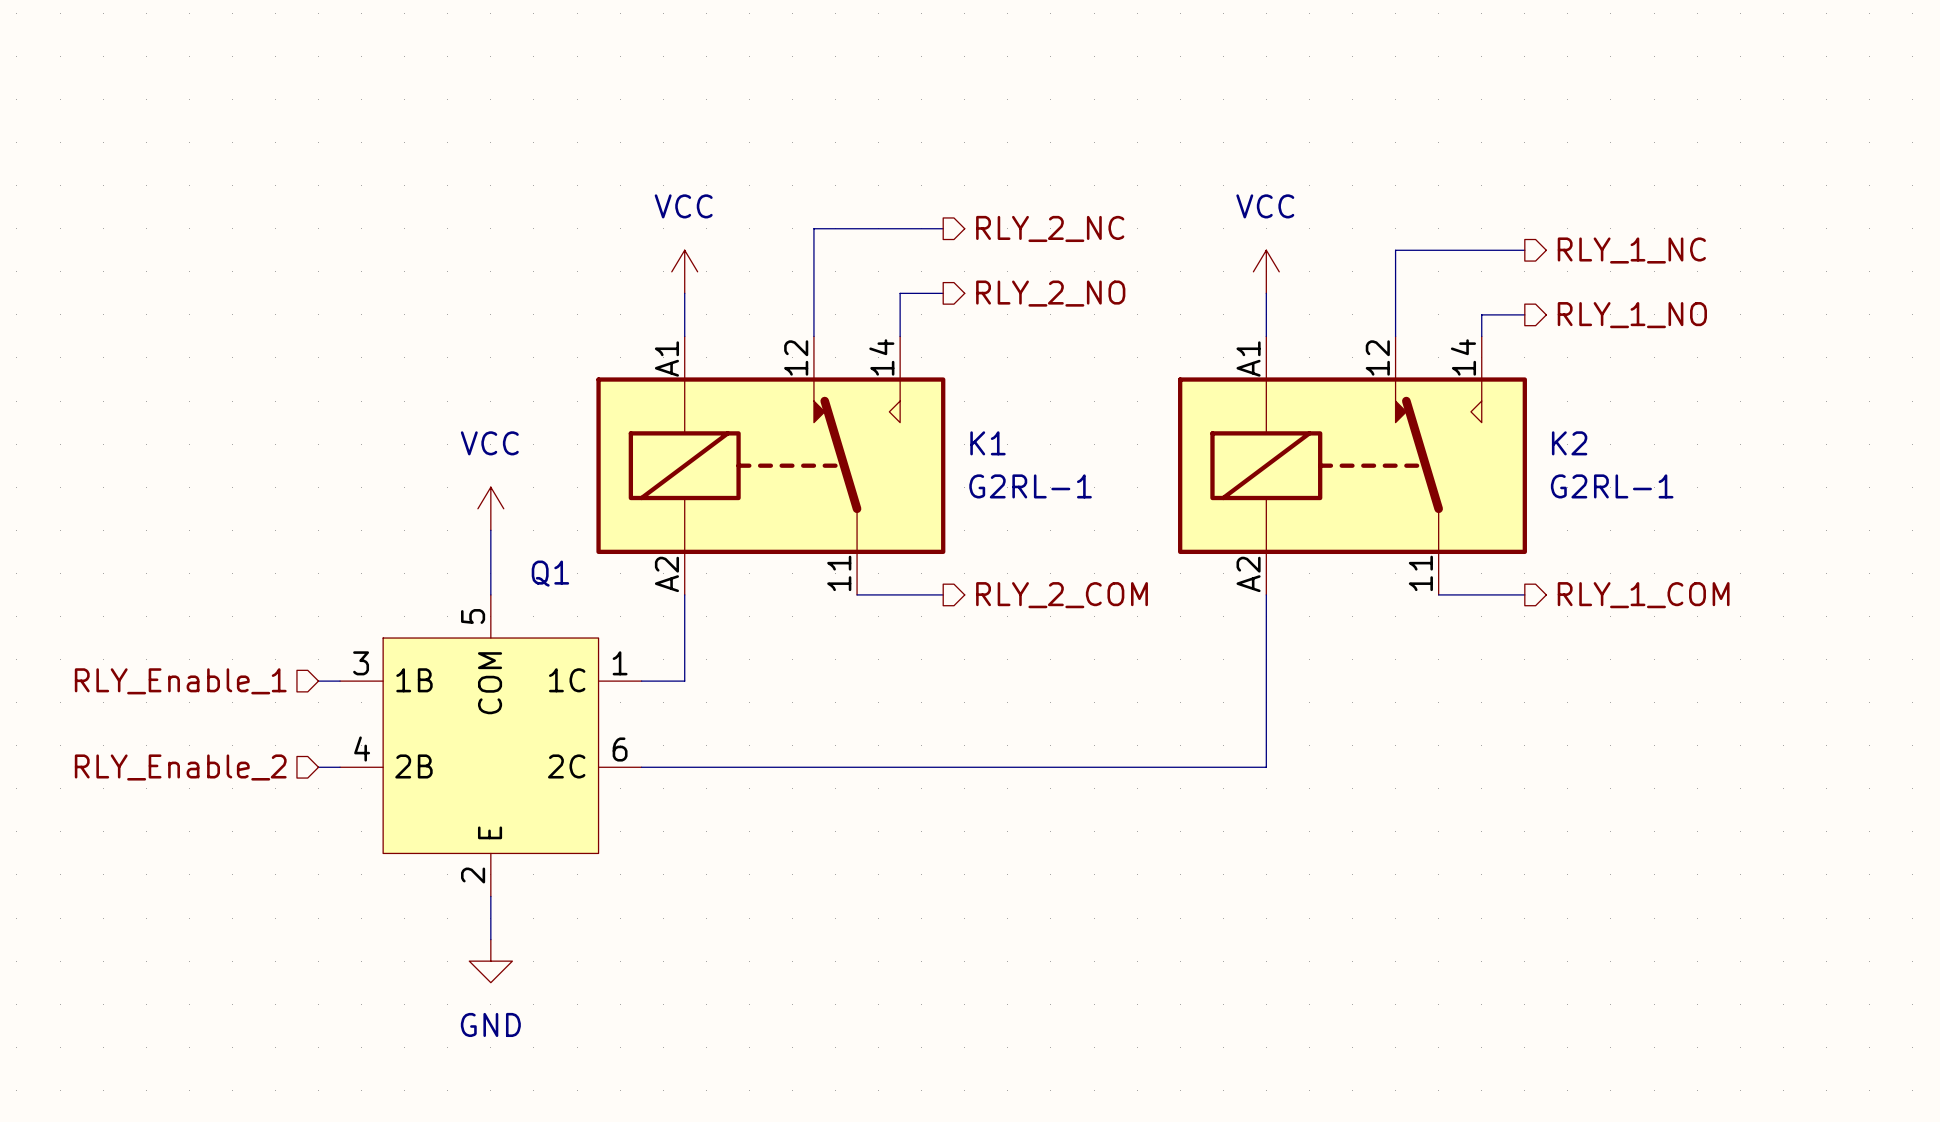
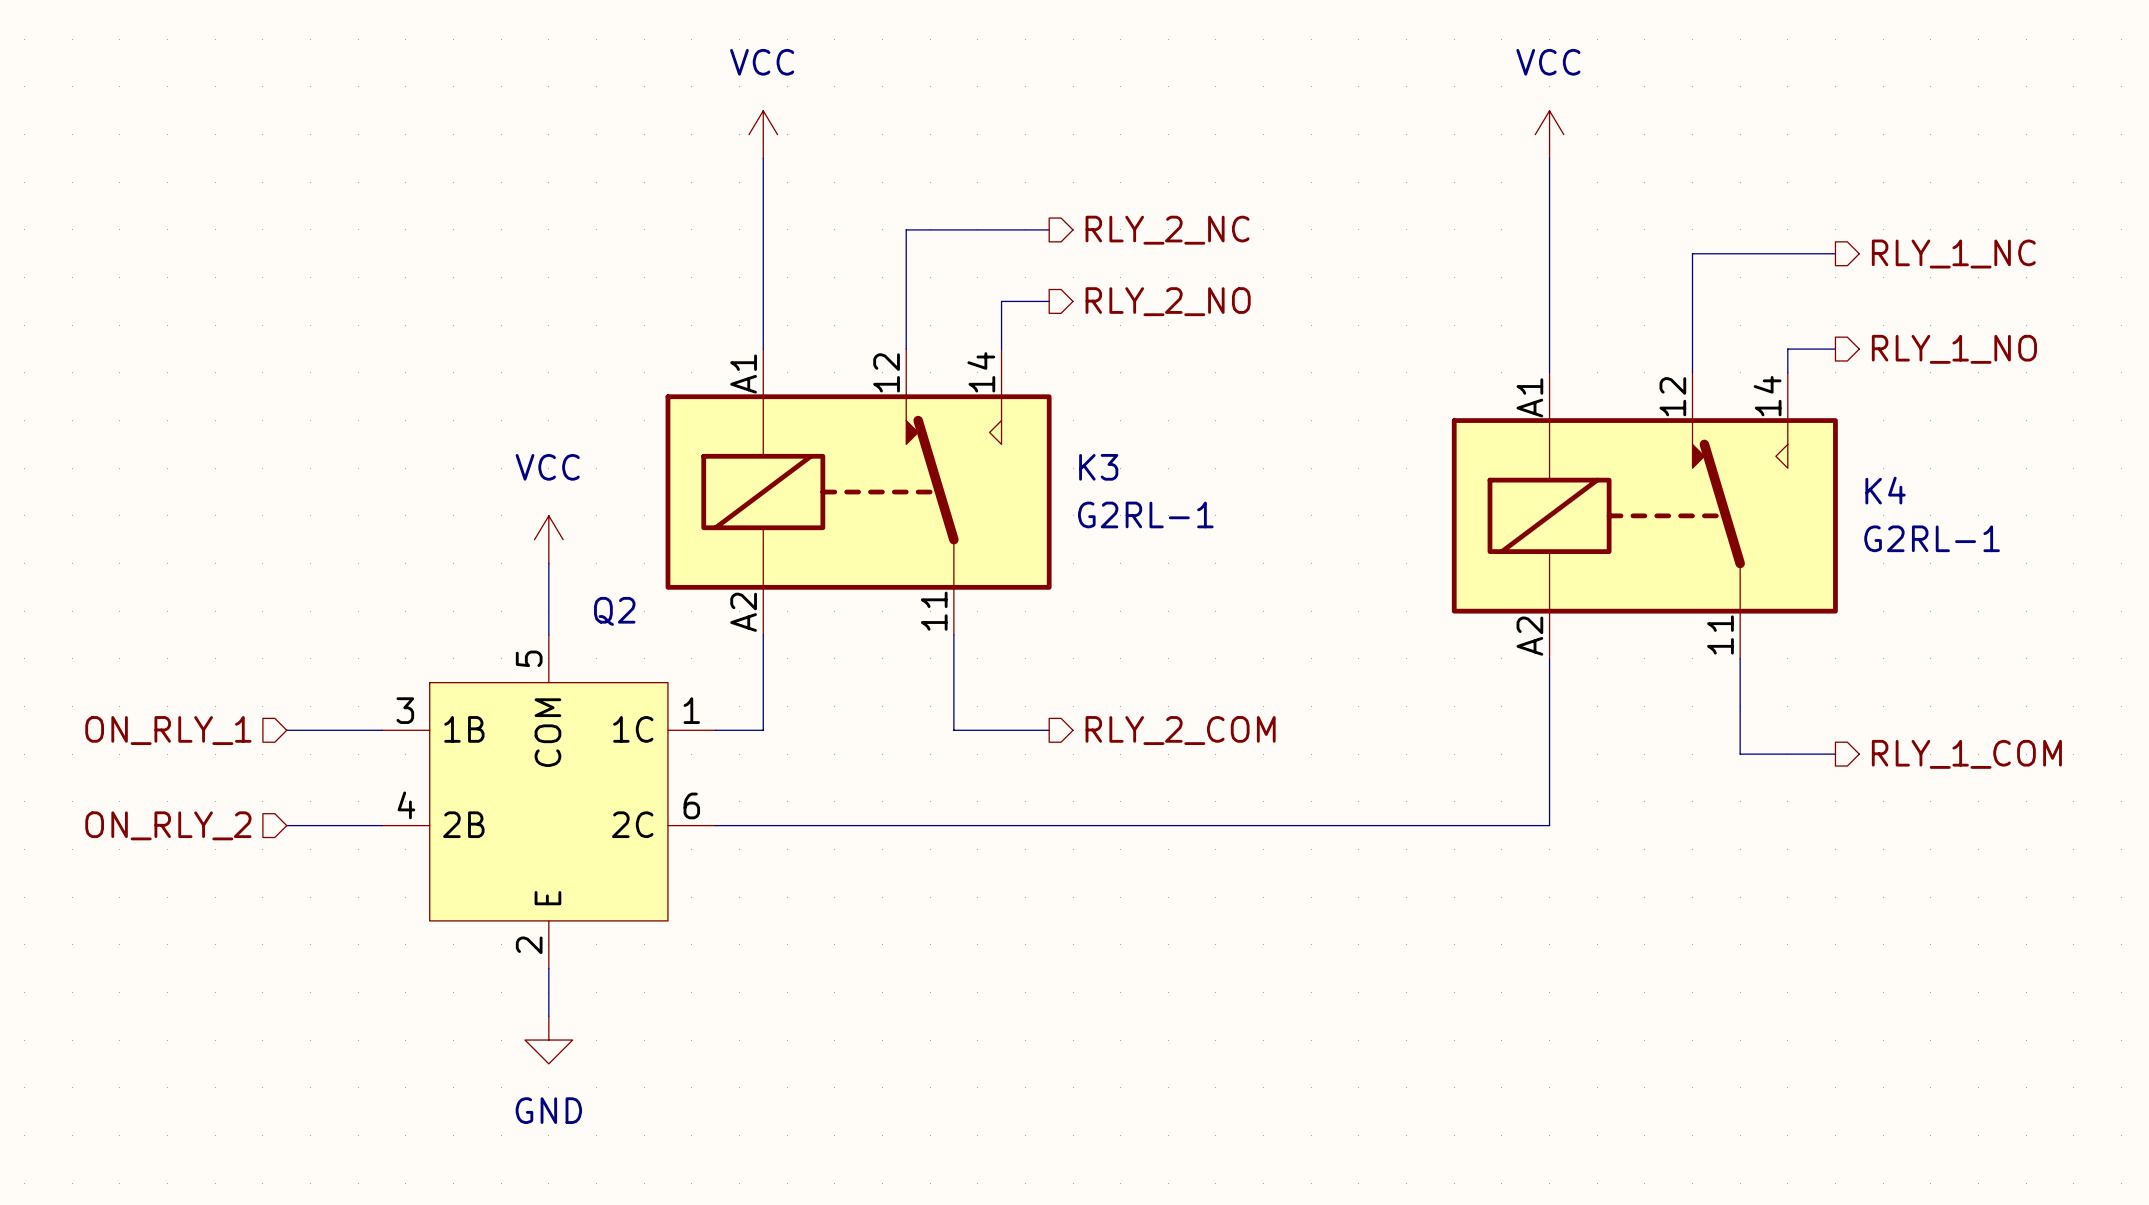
wire: none -> (763, 158) (763, 301)
wire: (1395, 250) (1524, 250) -> (1549, 253) (1549, 158)
hierarchical label position: RLY_1_NC (1631, 250) -> RLY_1_NC (1953, 254)
wire: none -> (1835, 253) (1692, 253) (1692, 372)
power symbol position: VCC (684, 271) -> VCC (763, 134)
power symbol position: VCC (1266, 271) -> VCC (1549, 134)
wire: (1266, 293) (1266, 336) -> none
wire: (1524, 314) (1481, 314) (1481, 336) -> (1835, 349) (1787, 349) (1787, 372)
hierarchical label position: RLY_1_NO (1632, 315) -> RLY_1_NO (1954, 349)
K1 name: K1 (987, 443) -> K3 (1098, 467)
K2: G2RL-1 (1352, 465) -> none
K4: none -> G2RL-1 (1644, 515)
Q1 name: Q1 (550, 573) -> Q2 (614, 611)
wire: (857, 594) (943, 594) -> (953, 634) (953, 730) (1049, 730)
wire: (1266, 594) (1266, 767) -> (1549, 658) (1549, 825) (1406, 825)
wire: (1438, 594) (1524, 594) -> none
hierarchical label position: RLY_2_COM (1062, 595) -> RLY_2_COM (1180, 730)
hierarchical label position: RLY_1_COM (1643, 595) -> RLY_1_COM (1966, 754)
wire: none -> (1740, 658) (1740, 754) (1835, 754)
hierarchical label: none -> ON_RLY_1 (168, 730)
hierarchical label: RLY_Enable_1 (180, 681) -> none
wire: none -> (286, 730) (358, 730)
hierarchical label: none -> ON_RLY_2 (168, 825)
hierarchical label: RLY_Enable_2 (180, 767) -> none
wire: none -> (286, 825) (358, 825)

